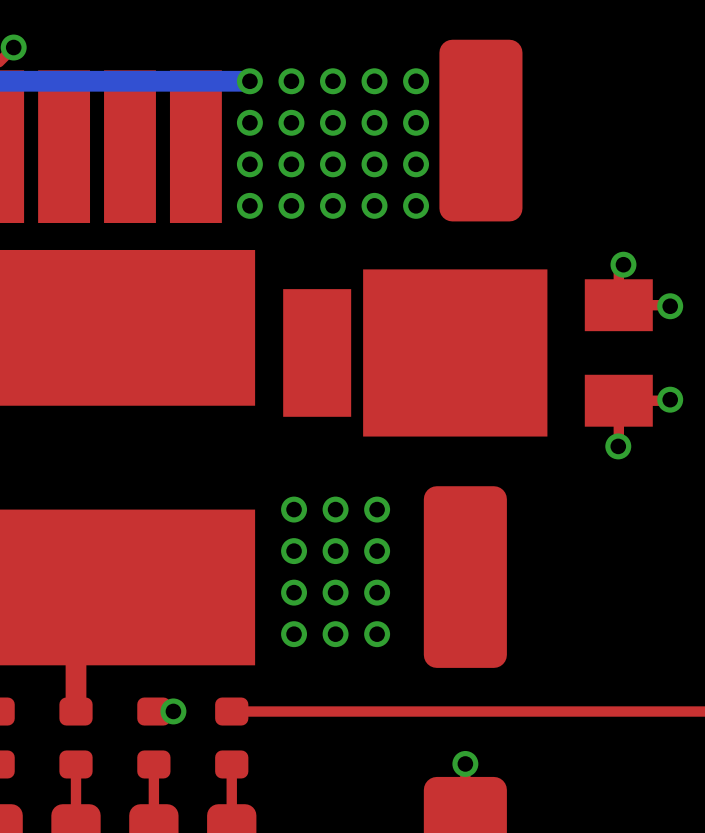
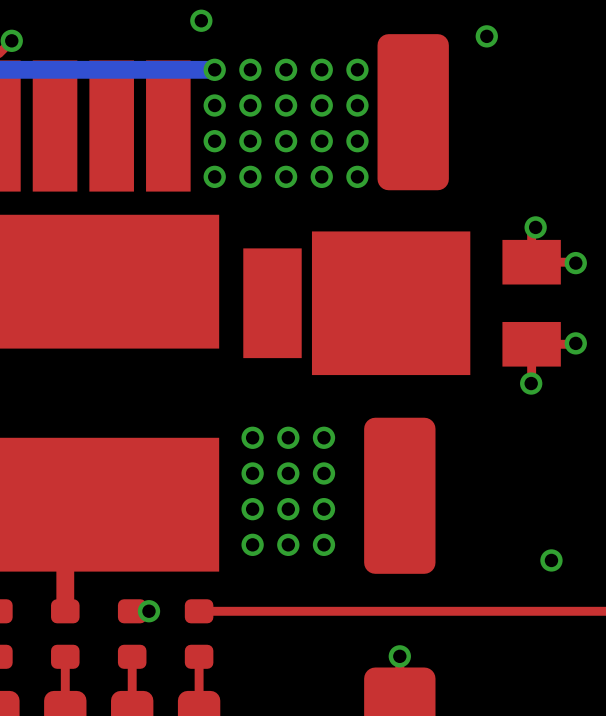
via: none -> (201, 20)
via: none -> (486, 36)
via: none -> (551, 560)

